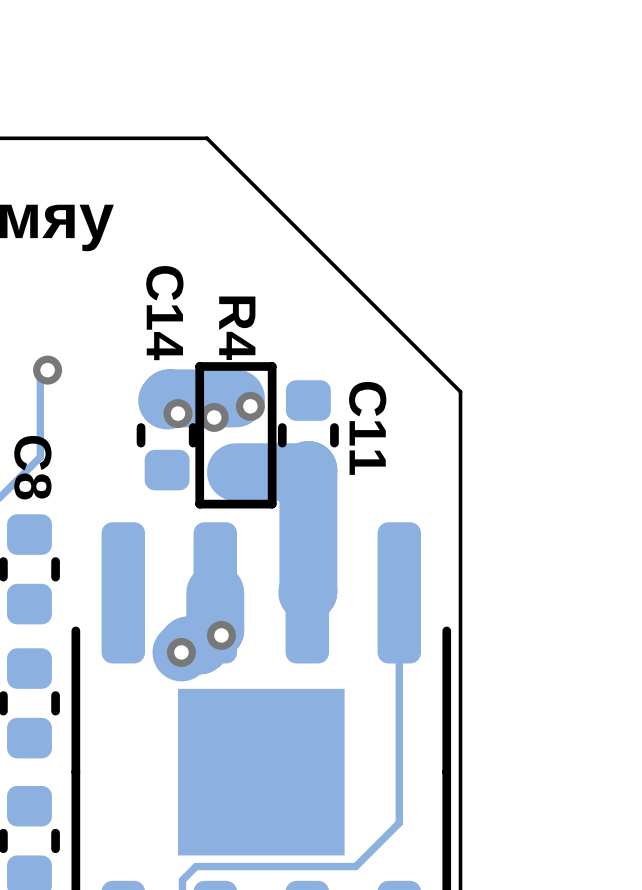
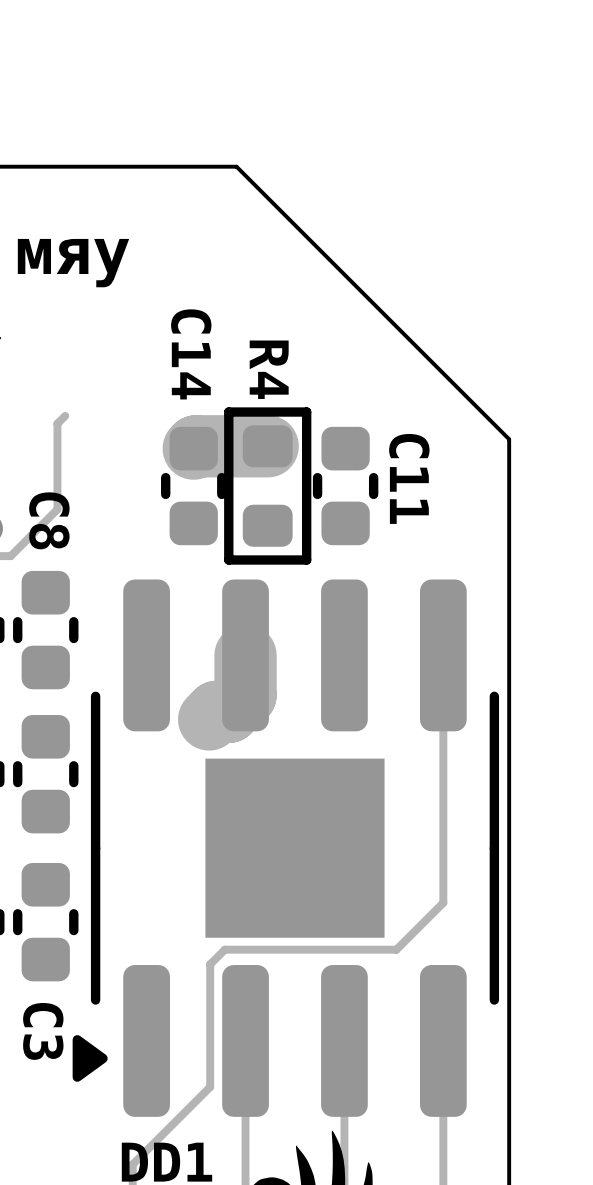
via: (47, 370) -> none
via: (250, 406) -> none
via: (177, 413) -> none
via: (214, 417) -> none
track: (235, 472) (306, 472) (308, 470) (307, 592) -> none
via: (221, 635) -> none
via: (181, 652) -> none

